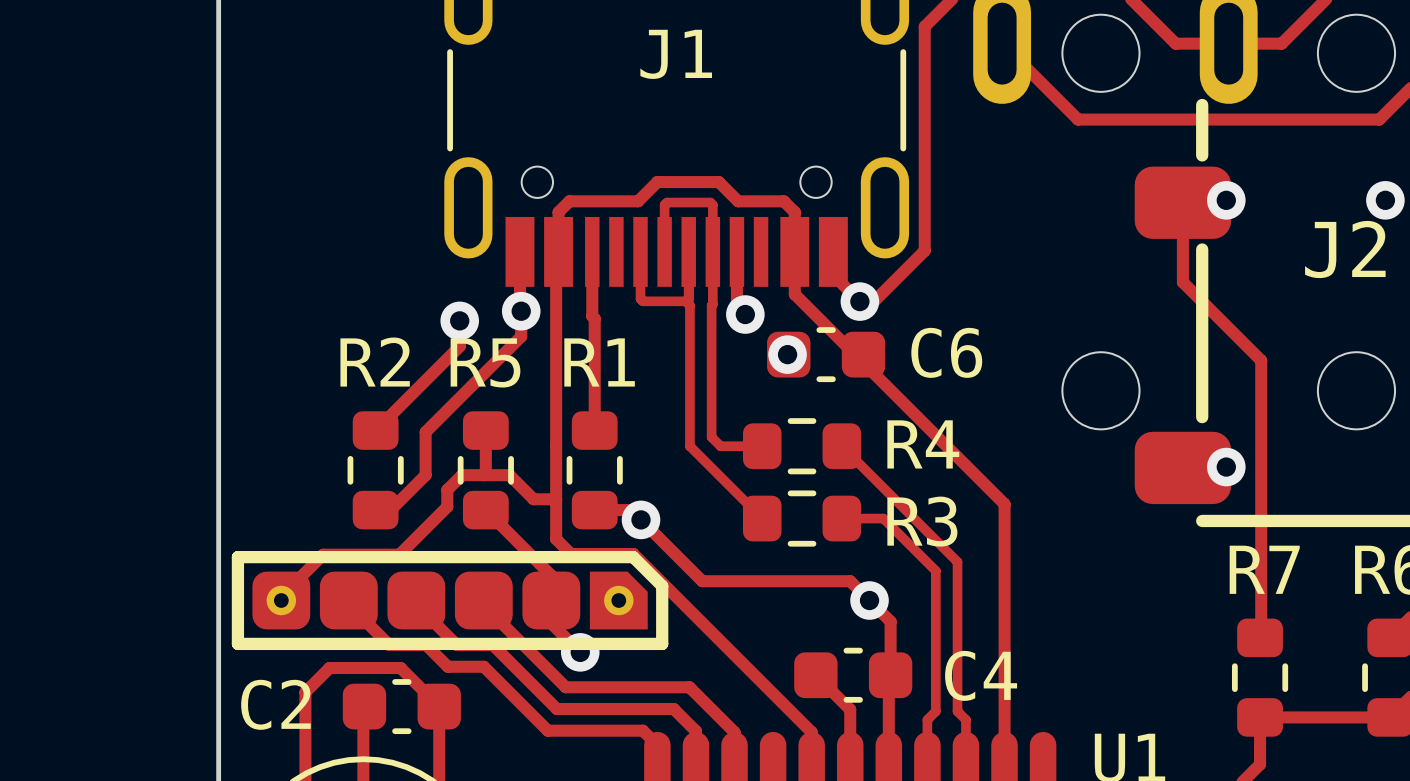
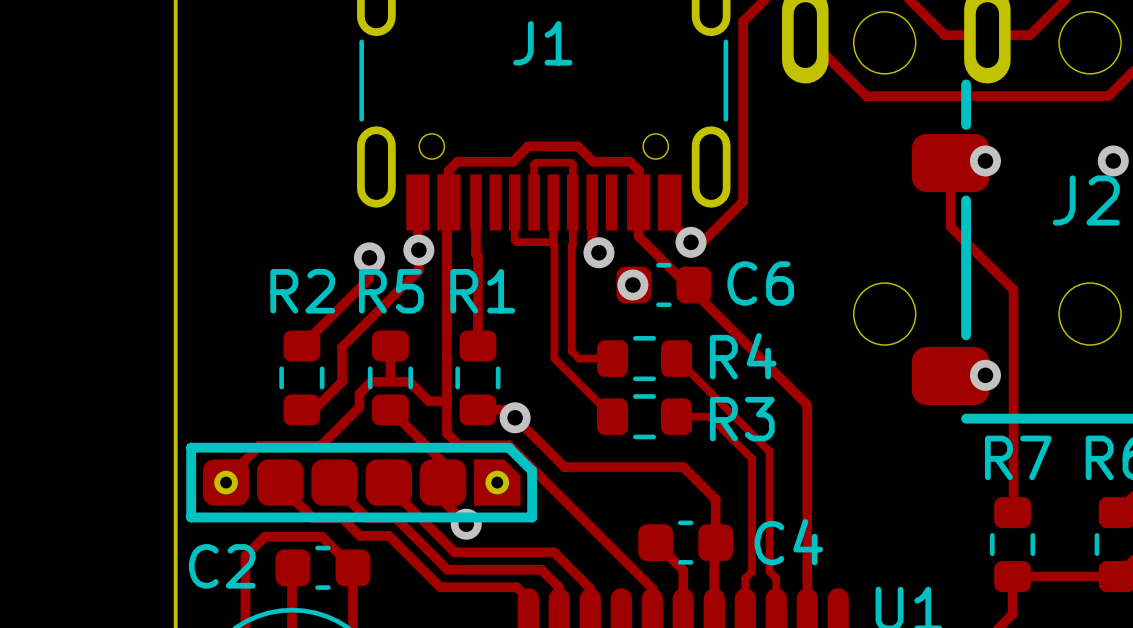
via: (869, 600) -> none

